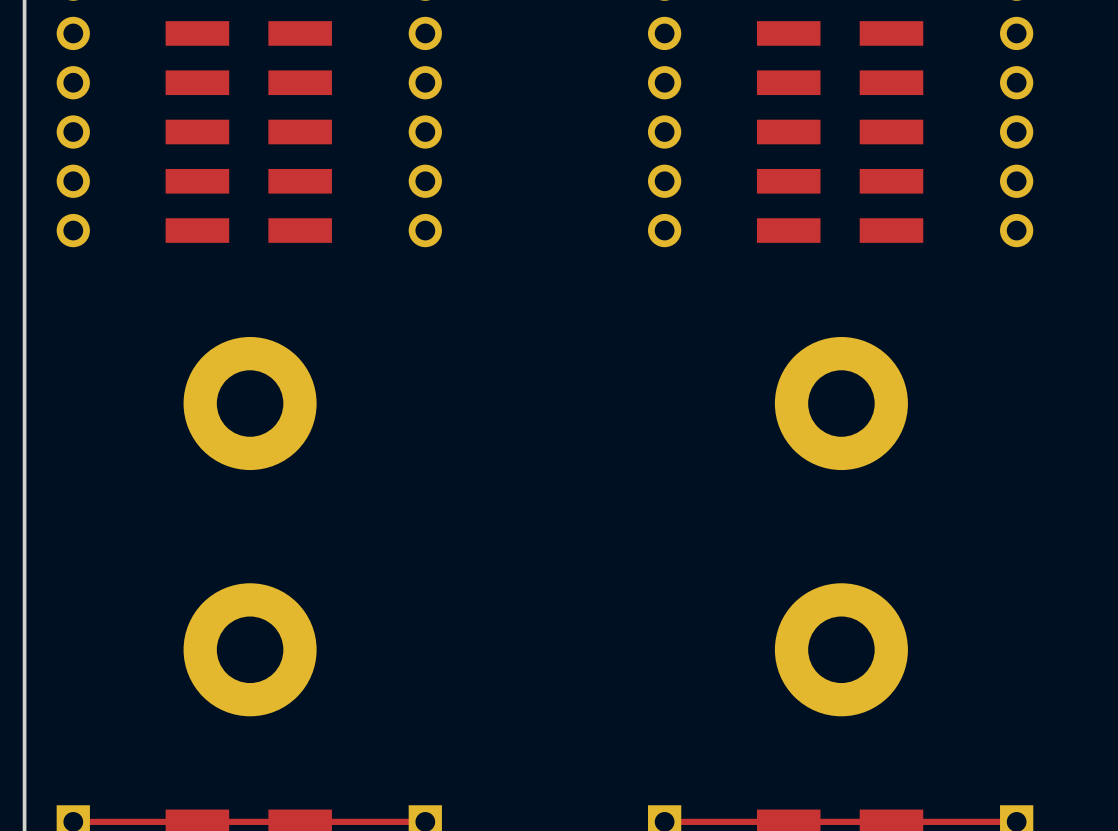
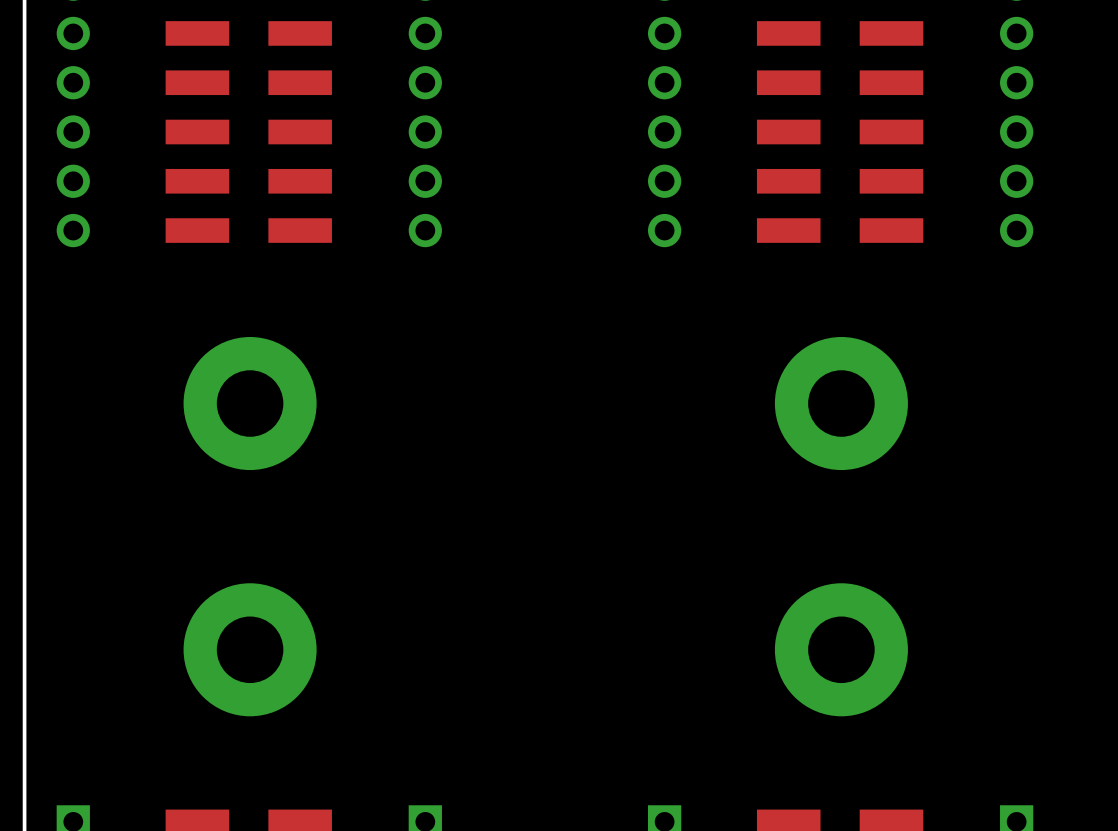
top track: (425, 821) (73, 821) -> none
top track: (1016, 821) (664, 821) -> none

